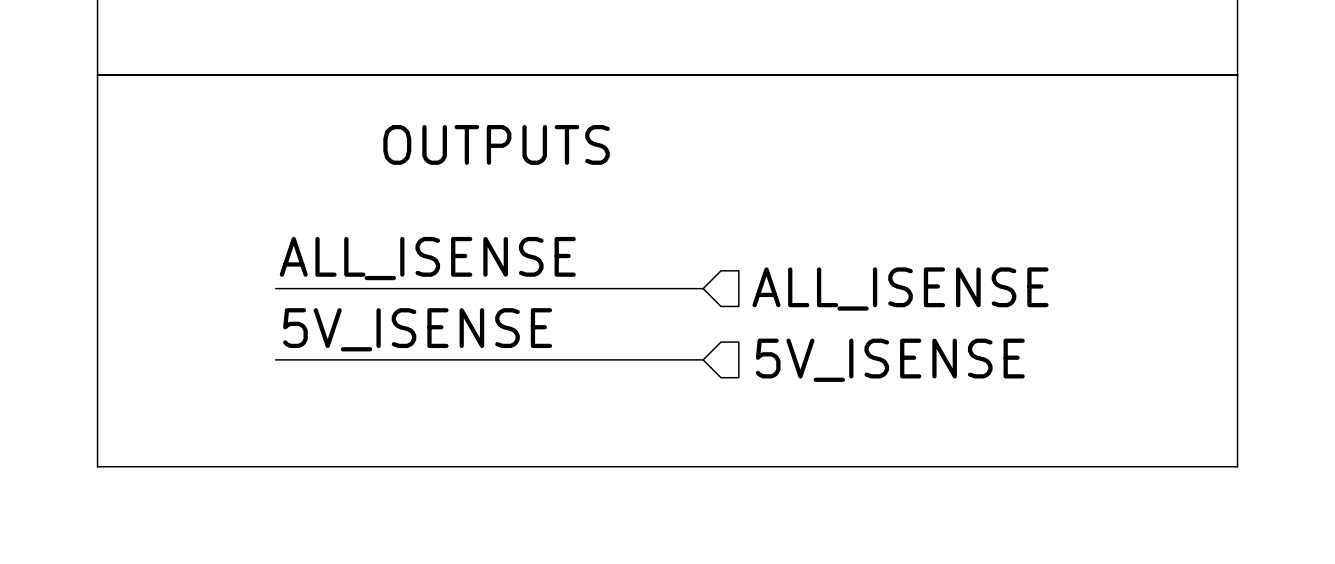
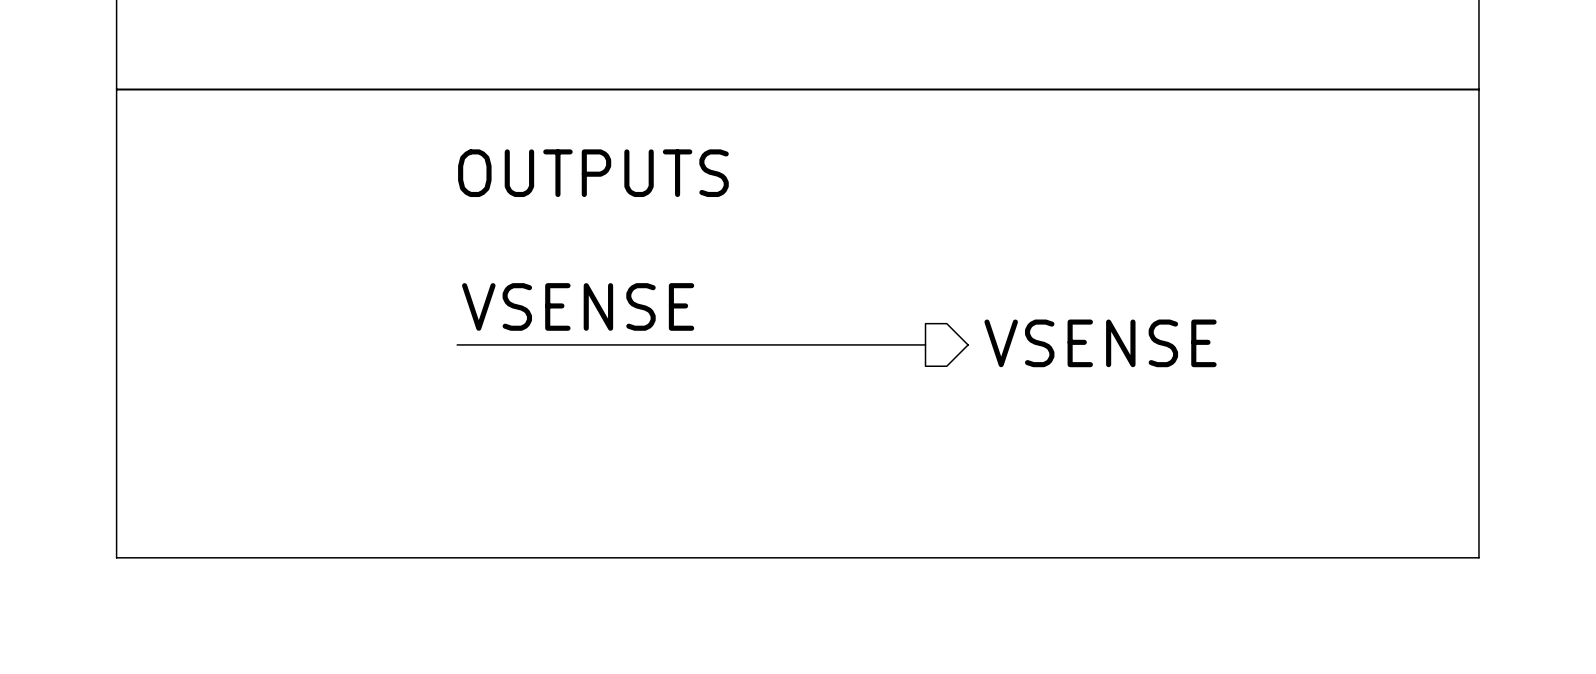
label: none -> VSENSE (578, 306)
label: ALL_ISENSE (427, 258) -> none
hierarchical label: none -> VSENSE (1100, 343)
wire: (275, 288) (382, 288) -> none
wire: none -> (840, 344) (925, 344)
hierarchical label: ALL_ISENSE (900, 289) -> none
label: 5V_ISENSE (417, 329) -> none
wire: (275, 359) (703, 359) -> none
hierarchical label: 5V_ISENSE (890, 360) -> none

